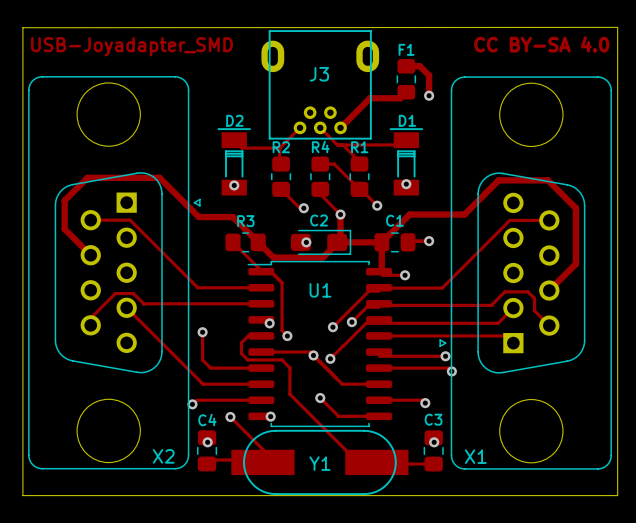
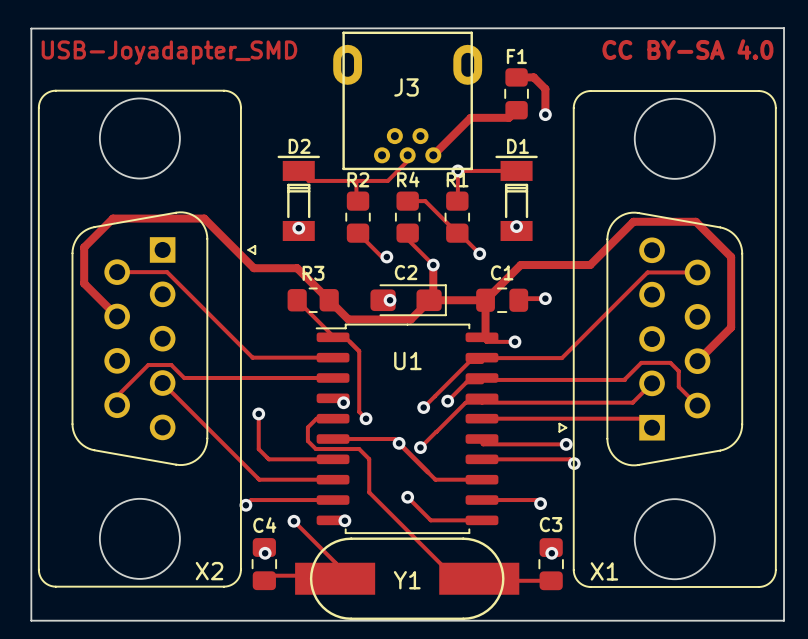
track: (300, 127) (279, 148) -> (407, 149) (407, 161) (387, 180) (356, 180)
track: (320, 127) (337, 144) (401, 144) -> none
via: none -> (457, 170)
track: none -> (516, 170) (457, 170) (457, 201)
track: (342, 144) (359, 161) -> none

